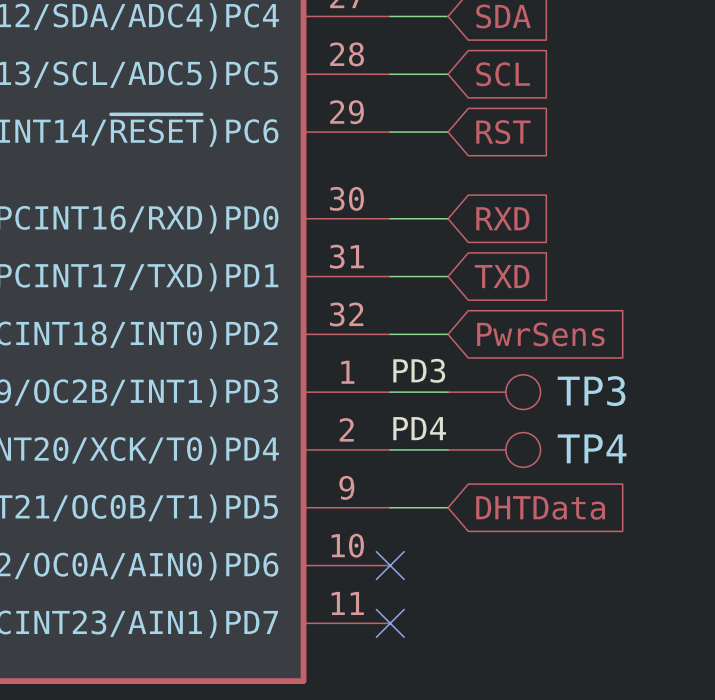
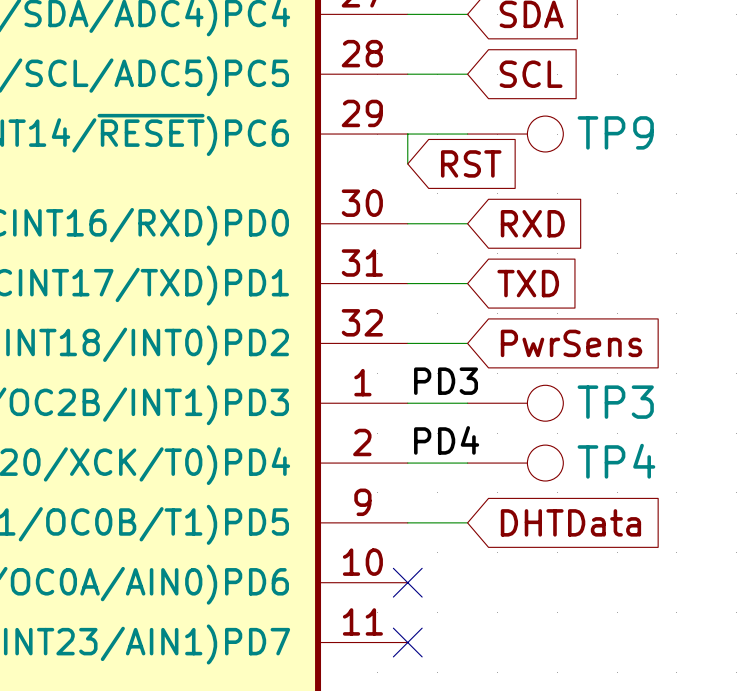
wire: none -> (407, 134) (407, 163)
TP9: none -> (515, 134)
global label position: RST (503, 132) -> RST (471, 163)

